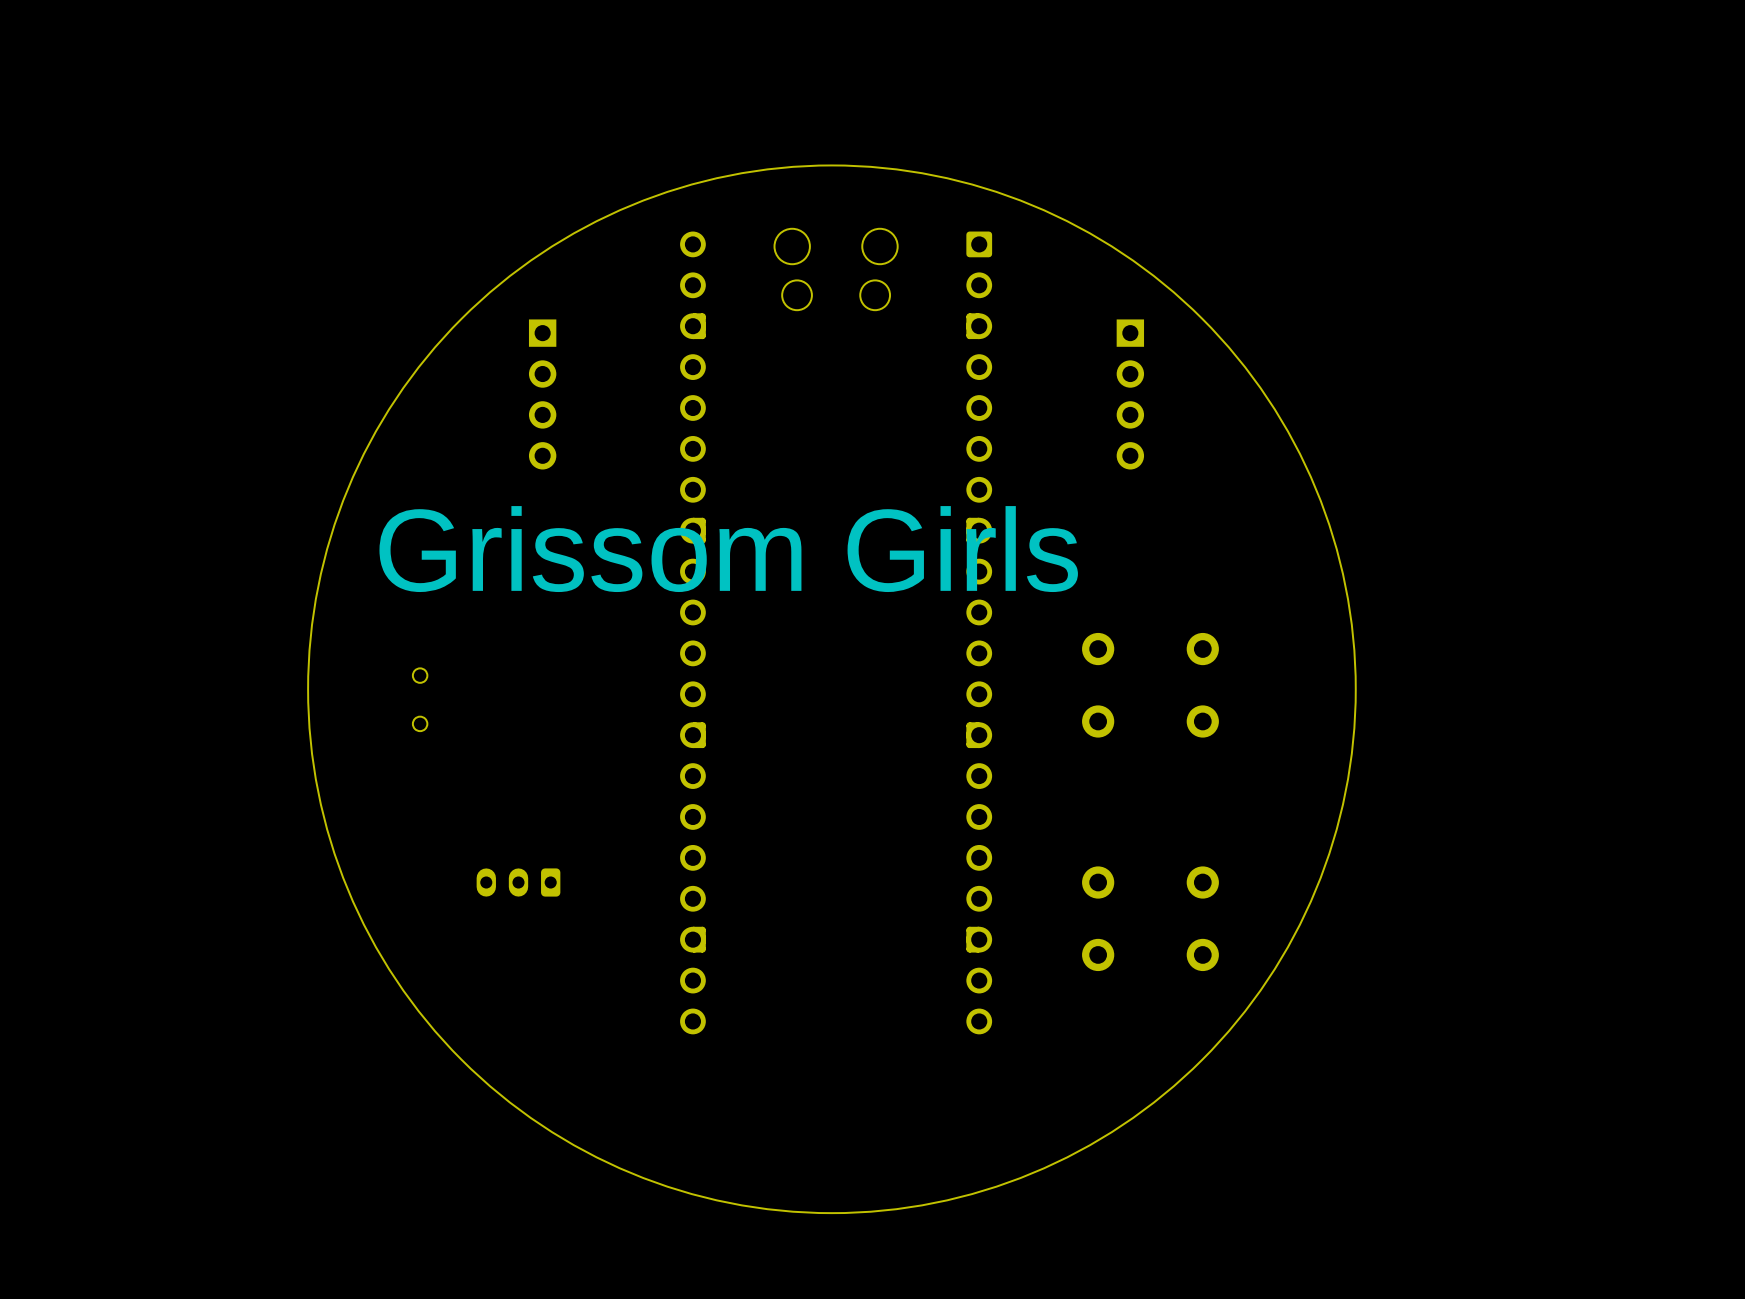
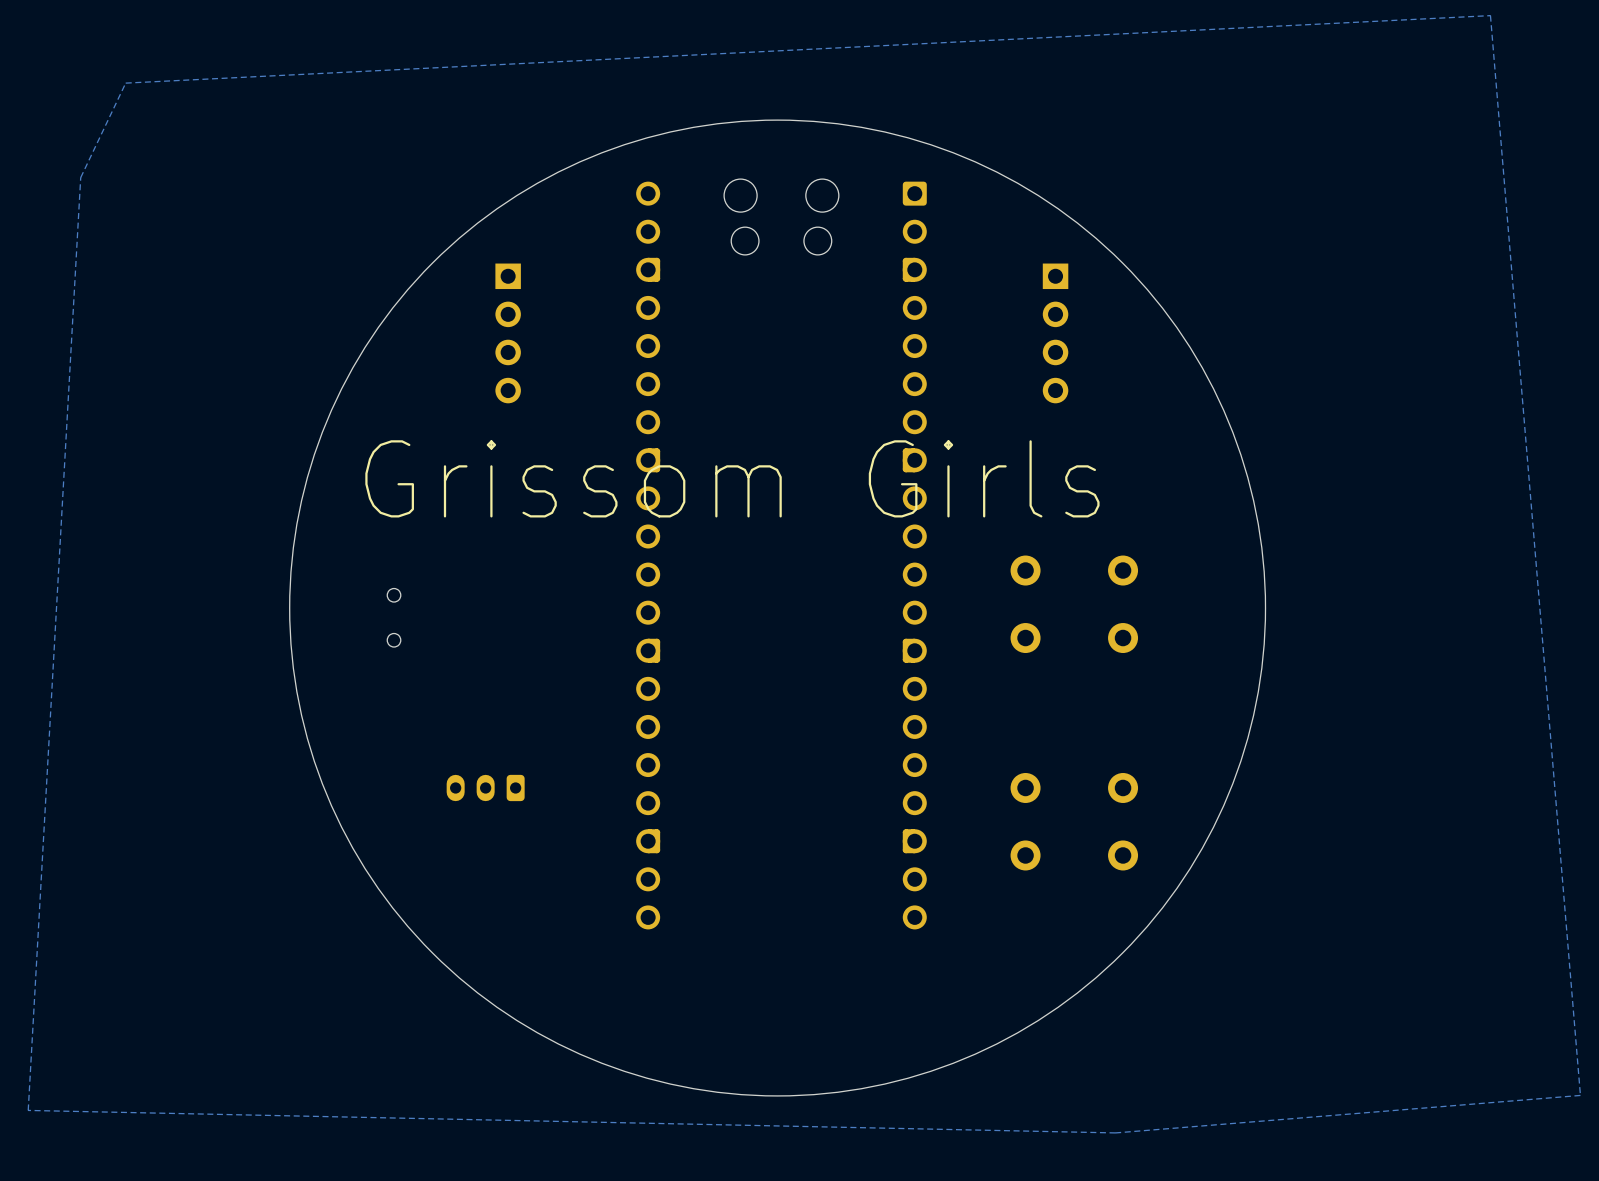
zone outline: none -> (1490, 15) (125, 83) (80, 177) (28, 1110) (1115, 1132) (1580, 1095) (1490, 15)

